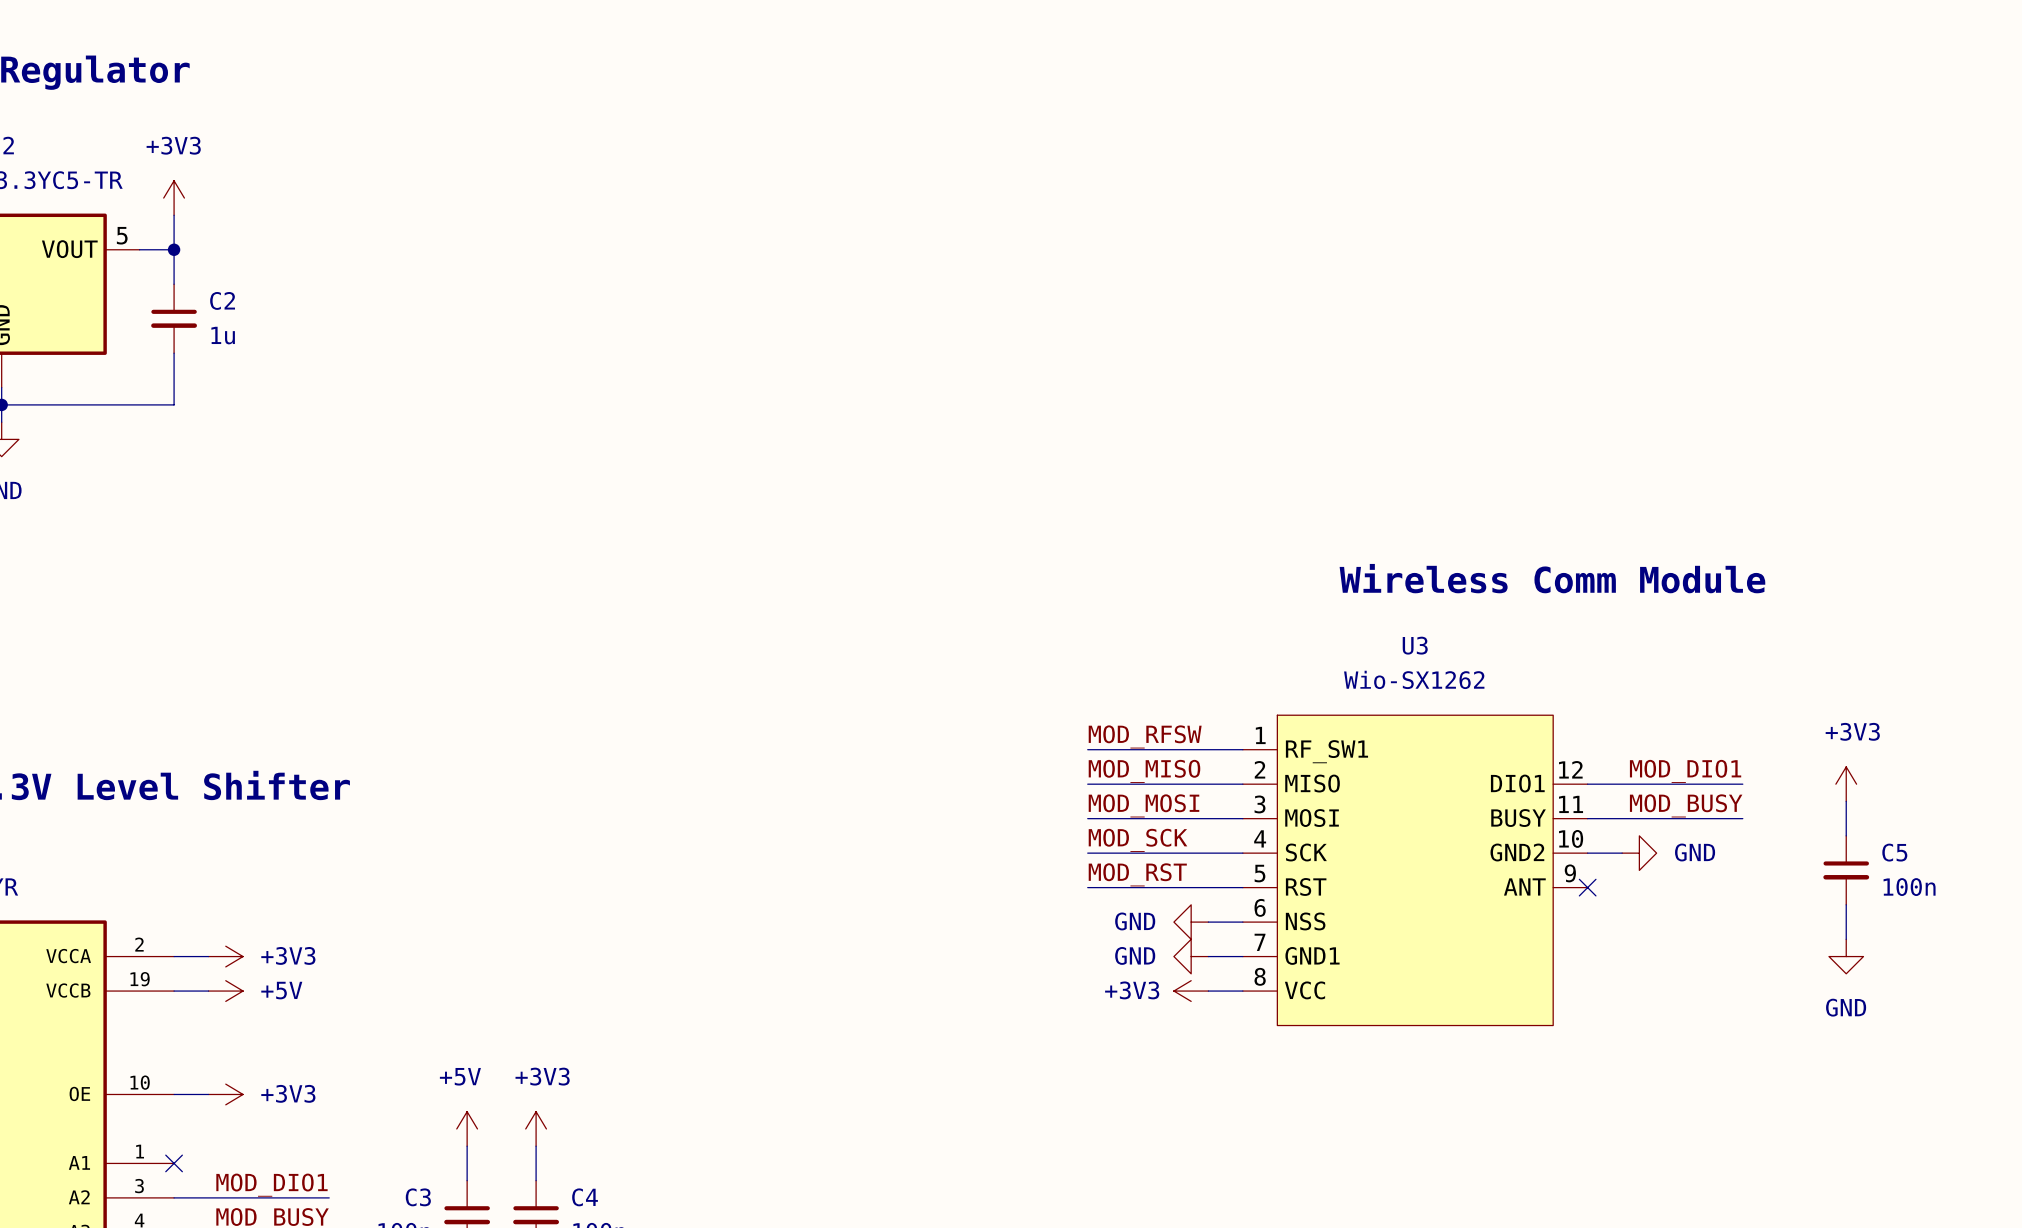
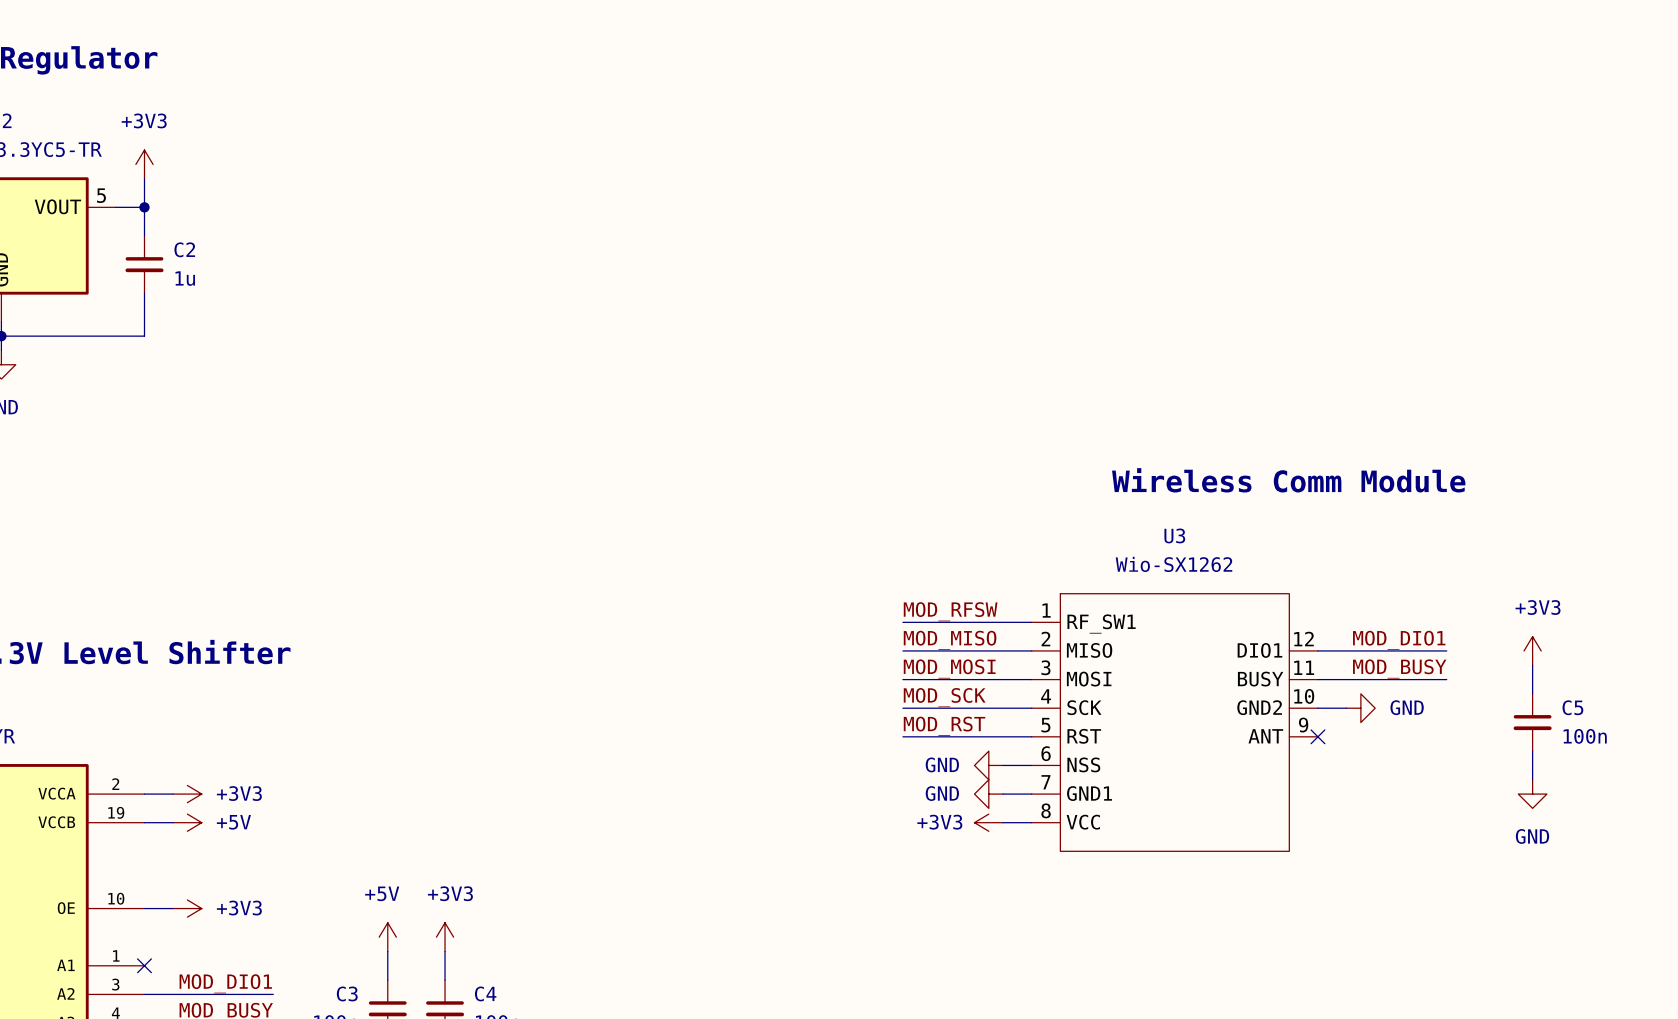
U3 symbol: [1242, 715, 1588, 1026] -> [1031, 593, 1318, 852]

